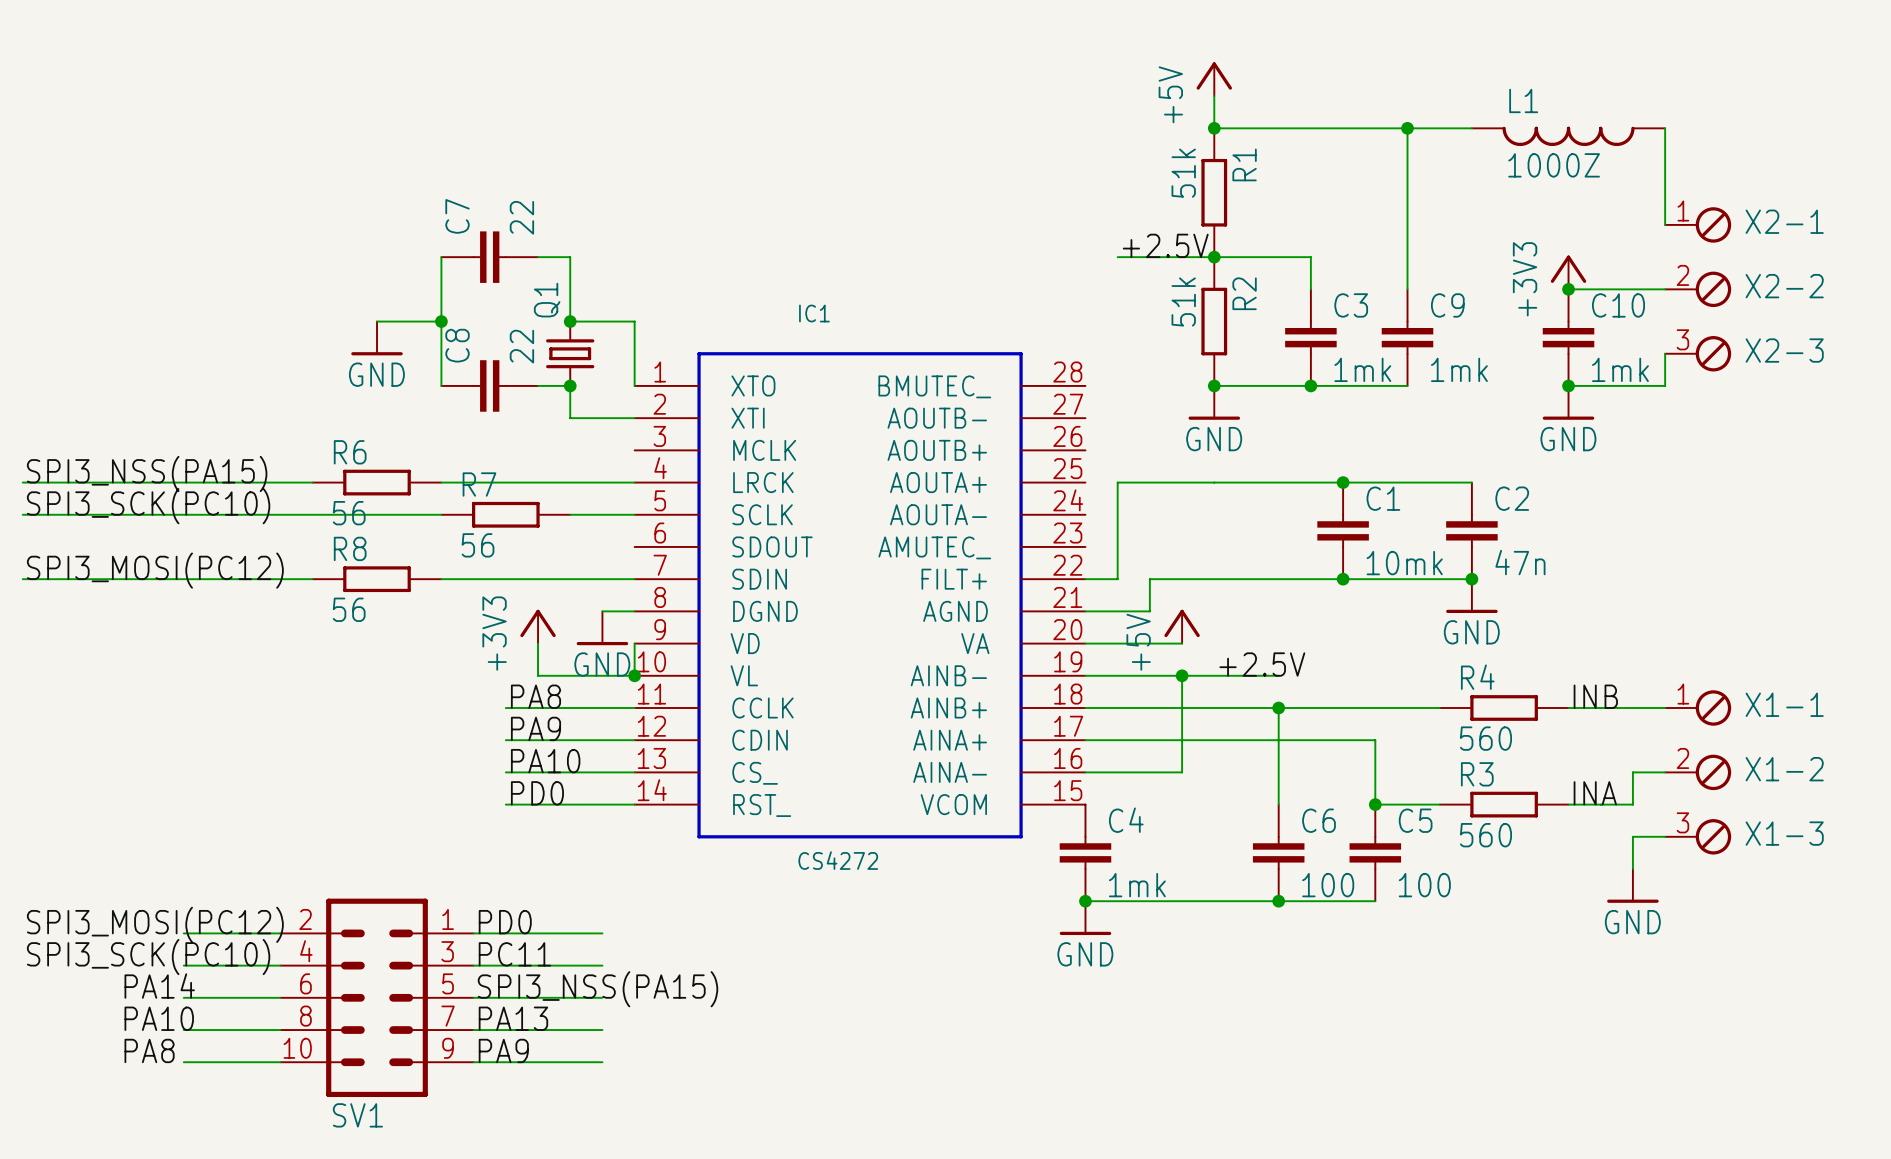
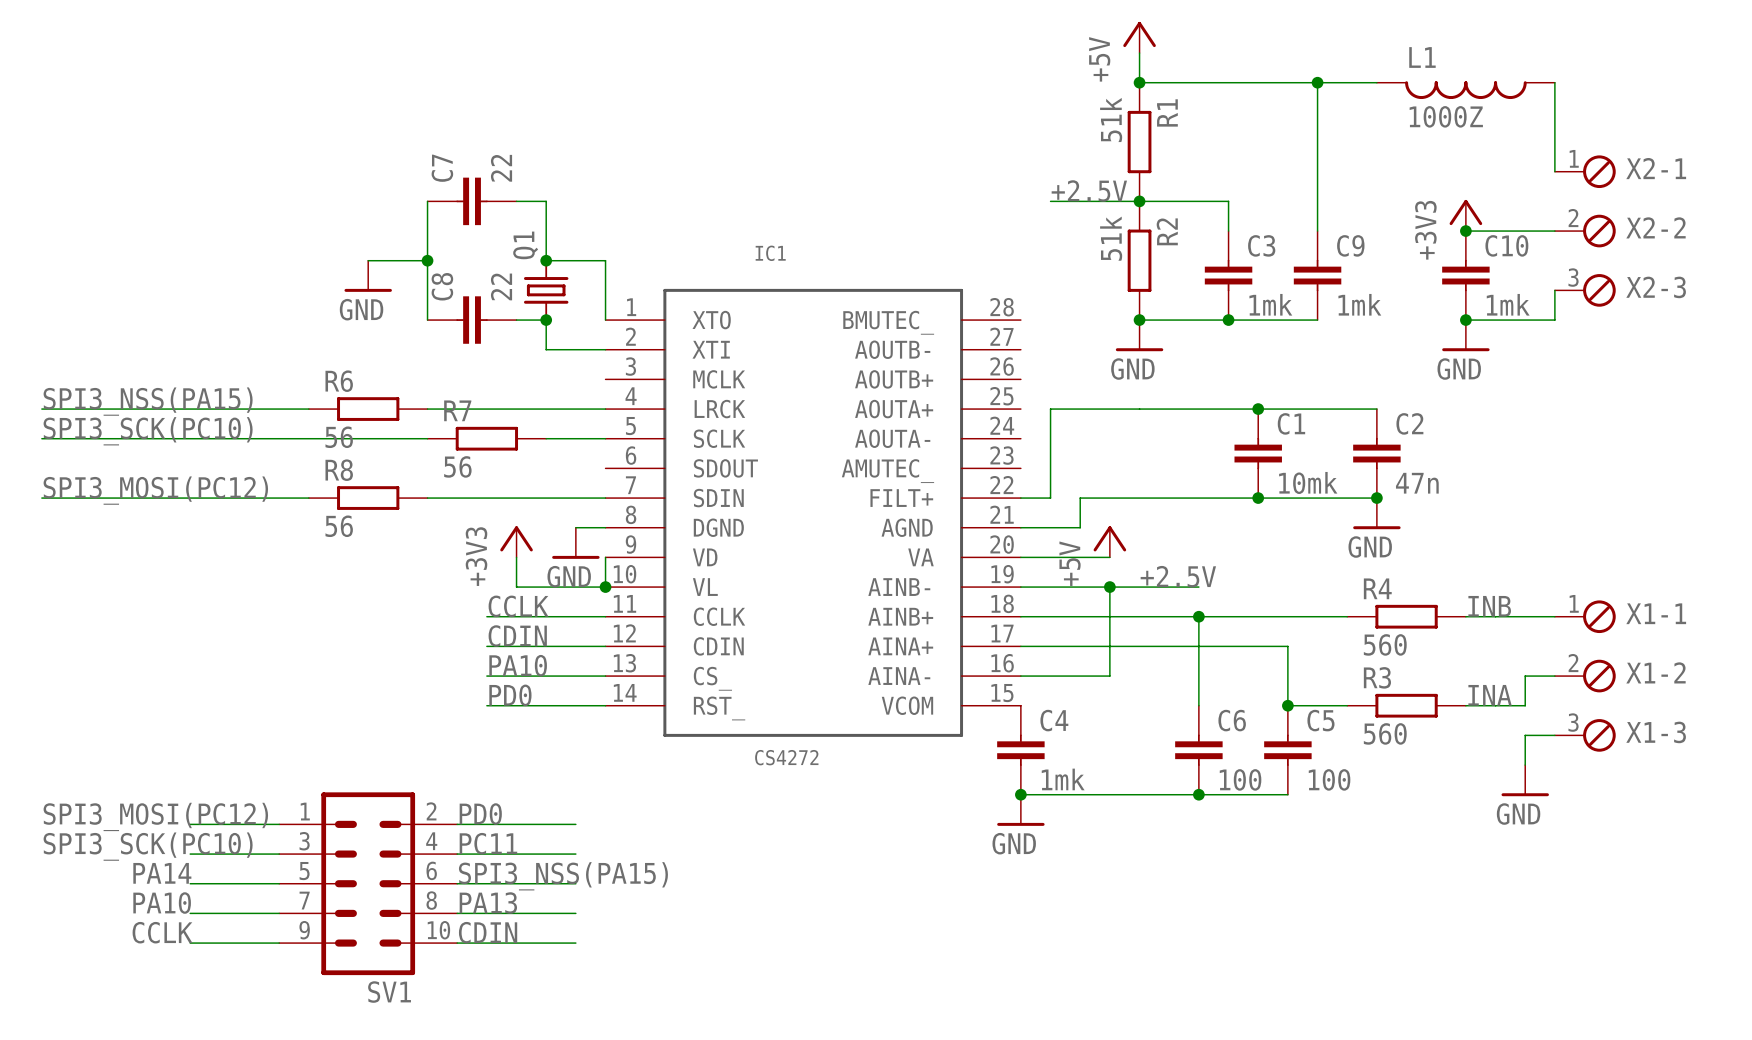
label: PA8 (535, 696) -> CCLK (518, 606)
label: PA9 (535, 728) -> CDIN (517, 636)
SV1 flip: as is (377, 997) -> left-right (368, 883)
label: PA8 (149, 1050) -> CCLK (162, 932)
label: PA9 (503, 1050) -> CDIN (488, 932)

